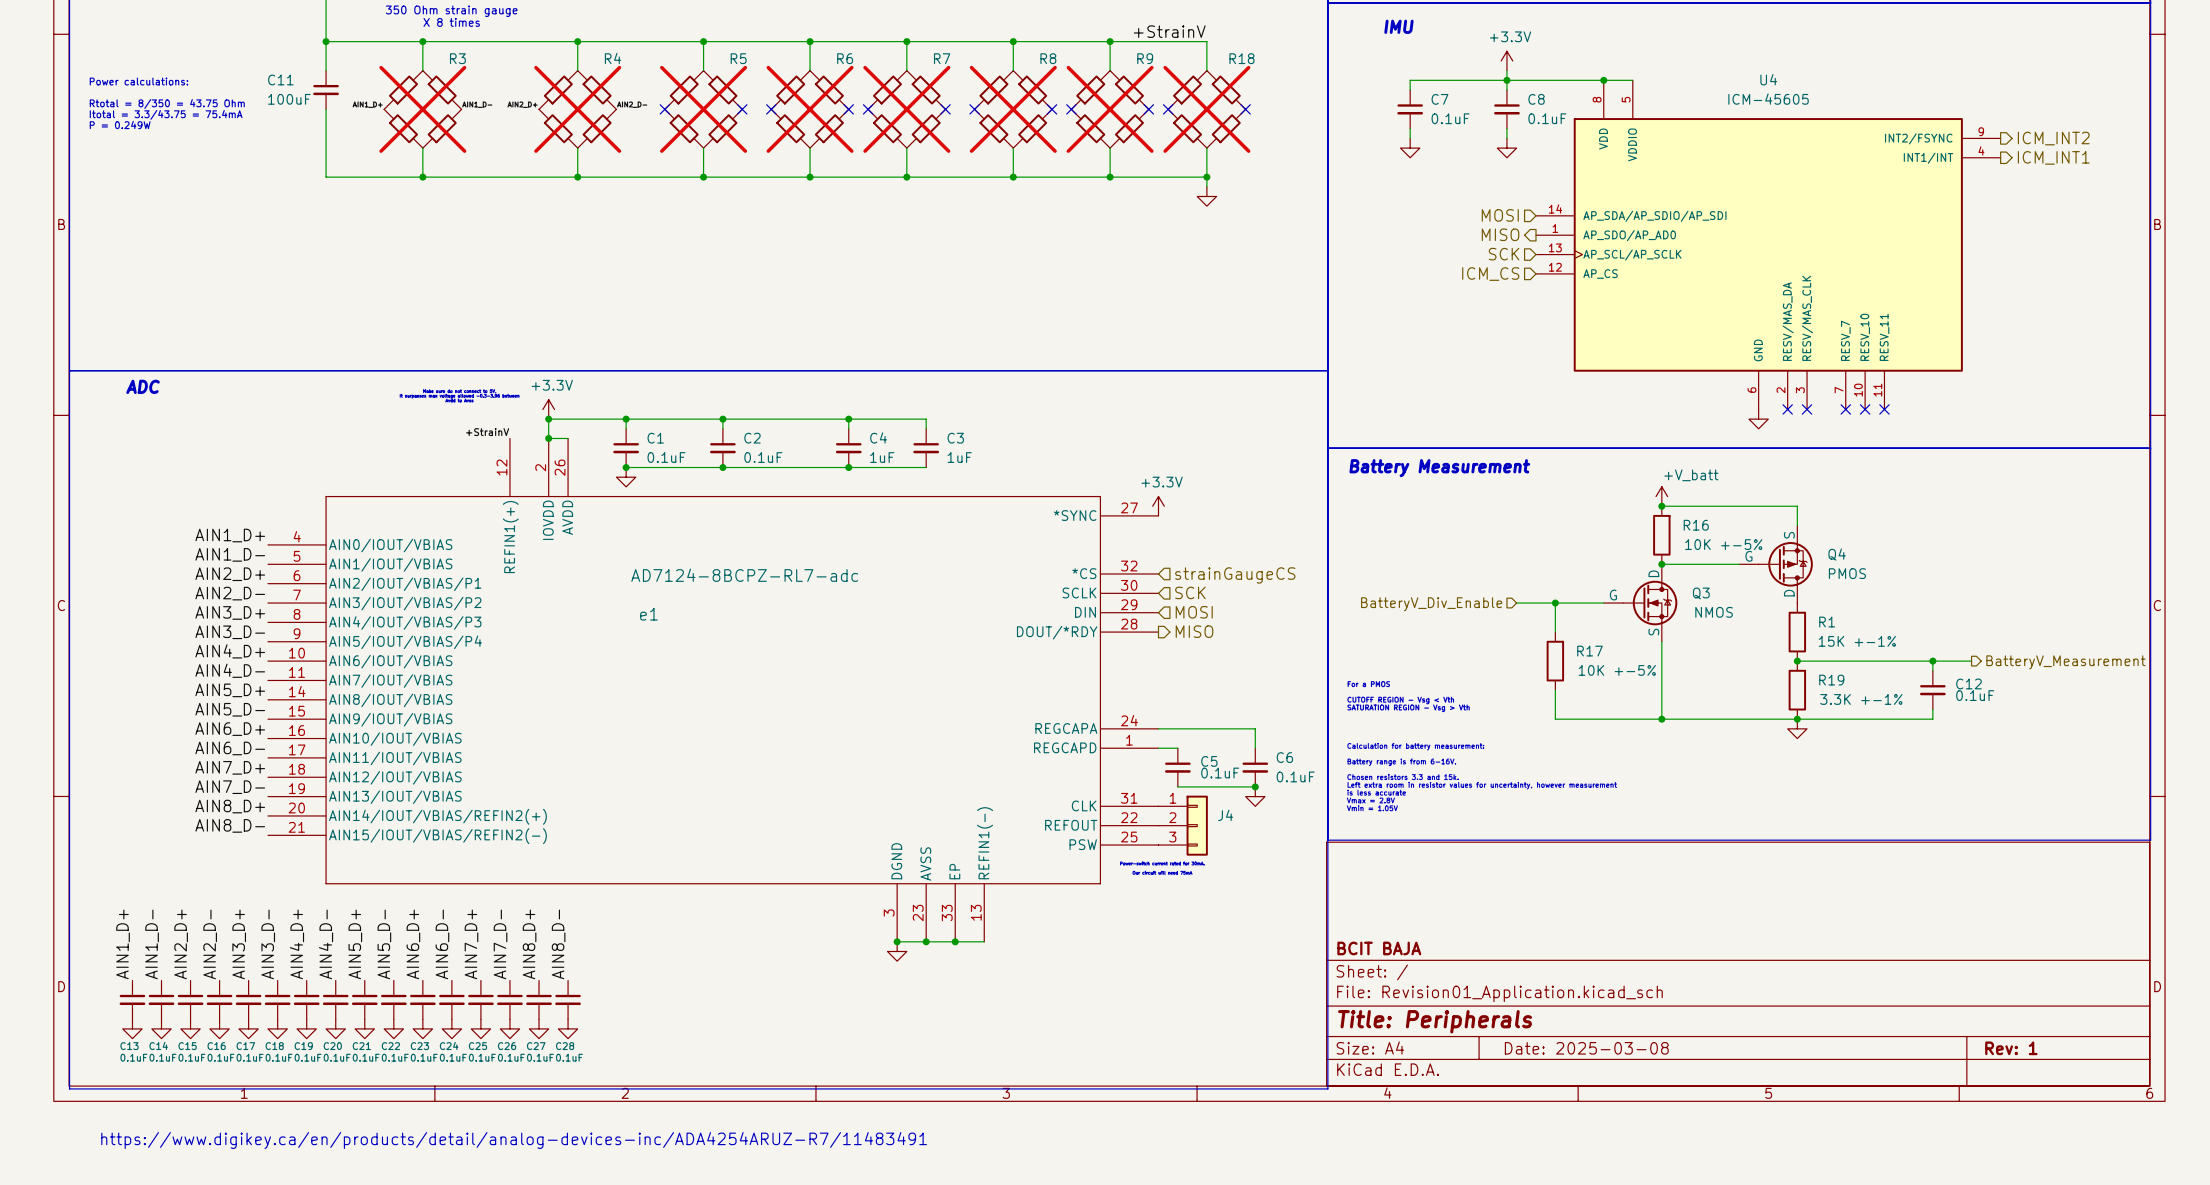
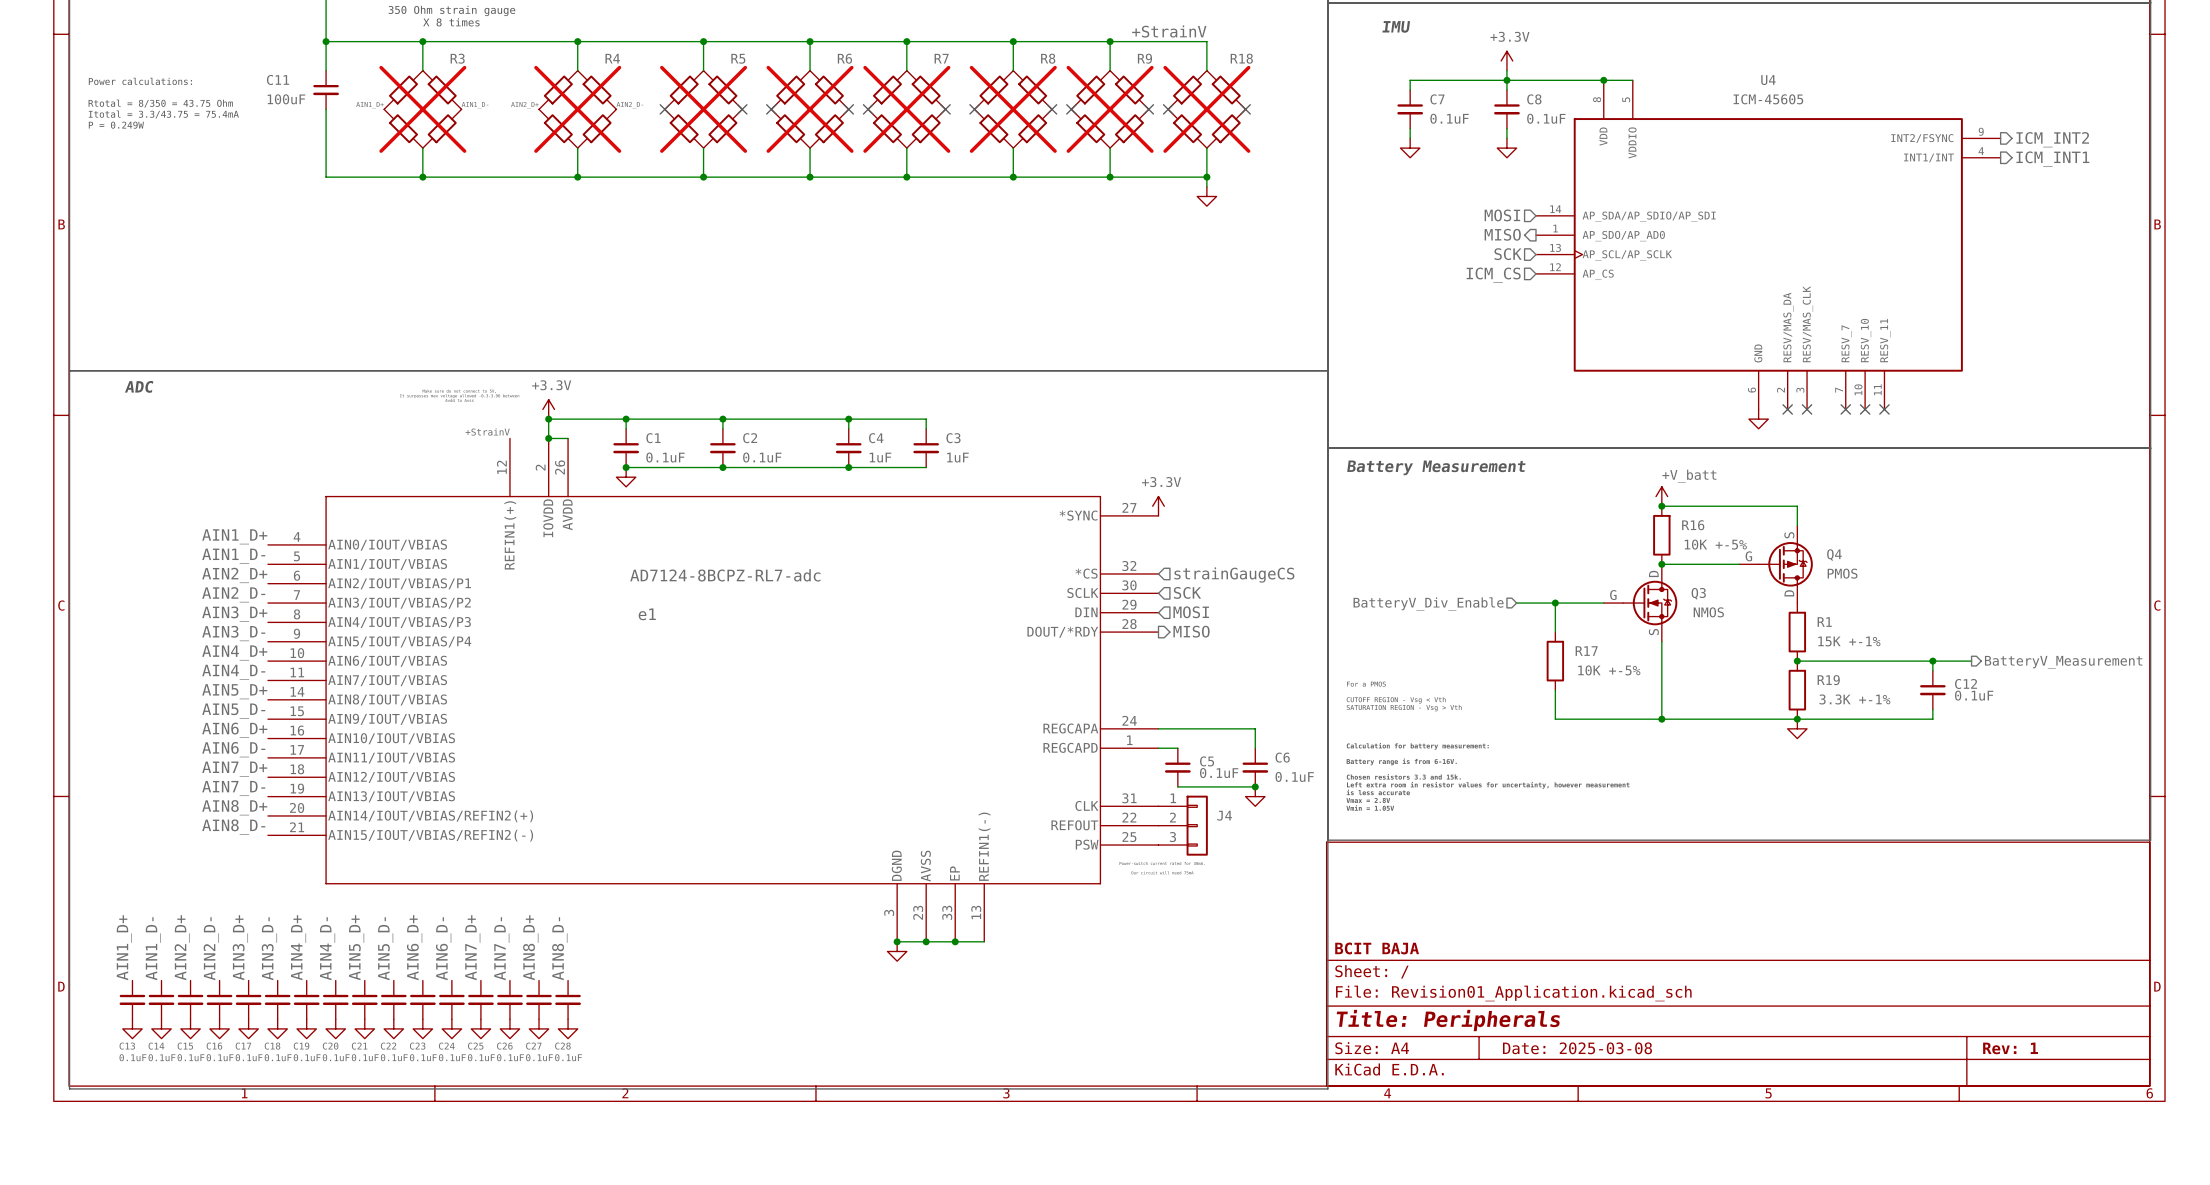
text: https://www.digikey.ca/en/products/detail/analog-devices-inc/ADA4254ARUZ-R7/11483491 (514, 1140) -> none

